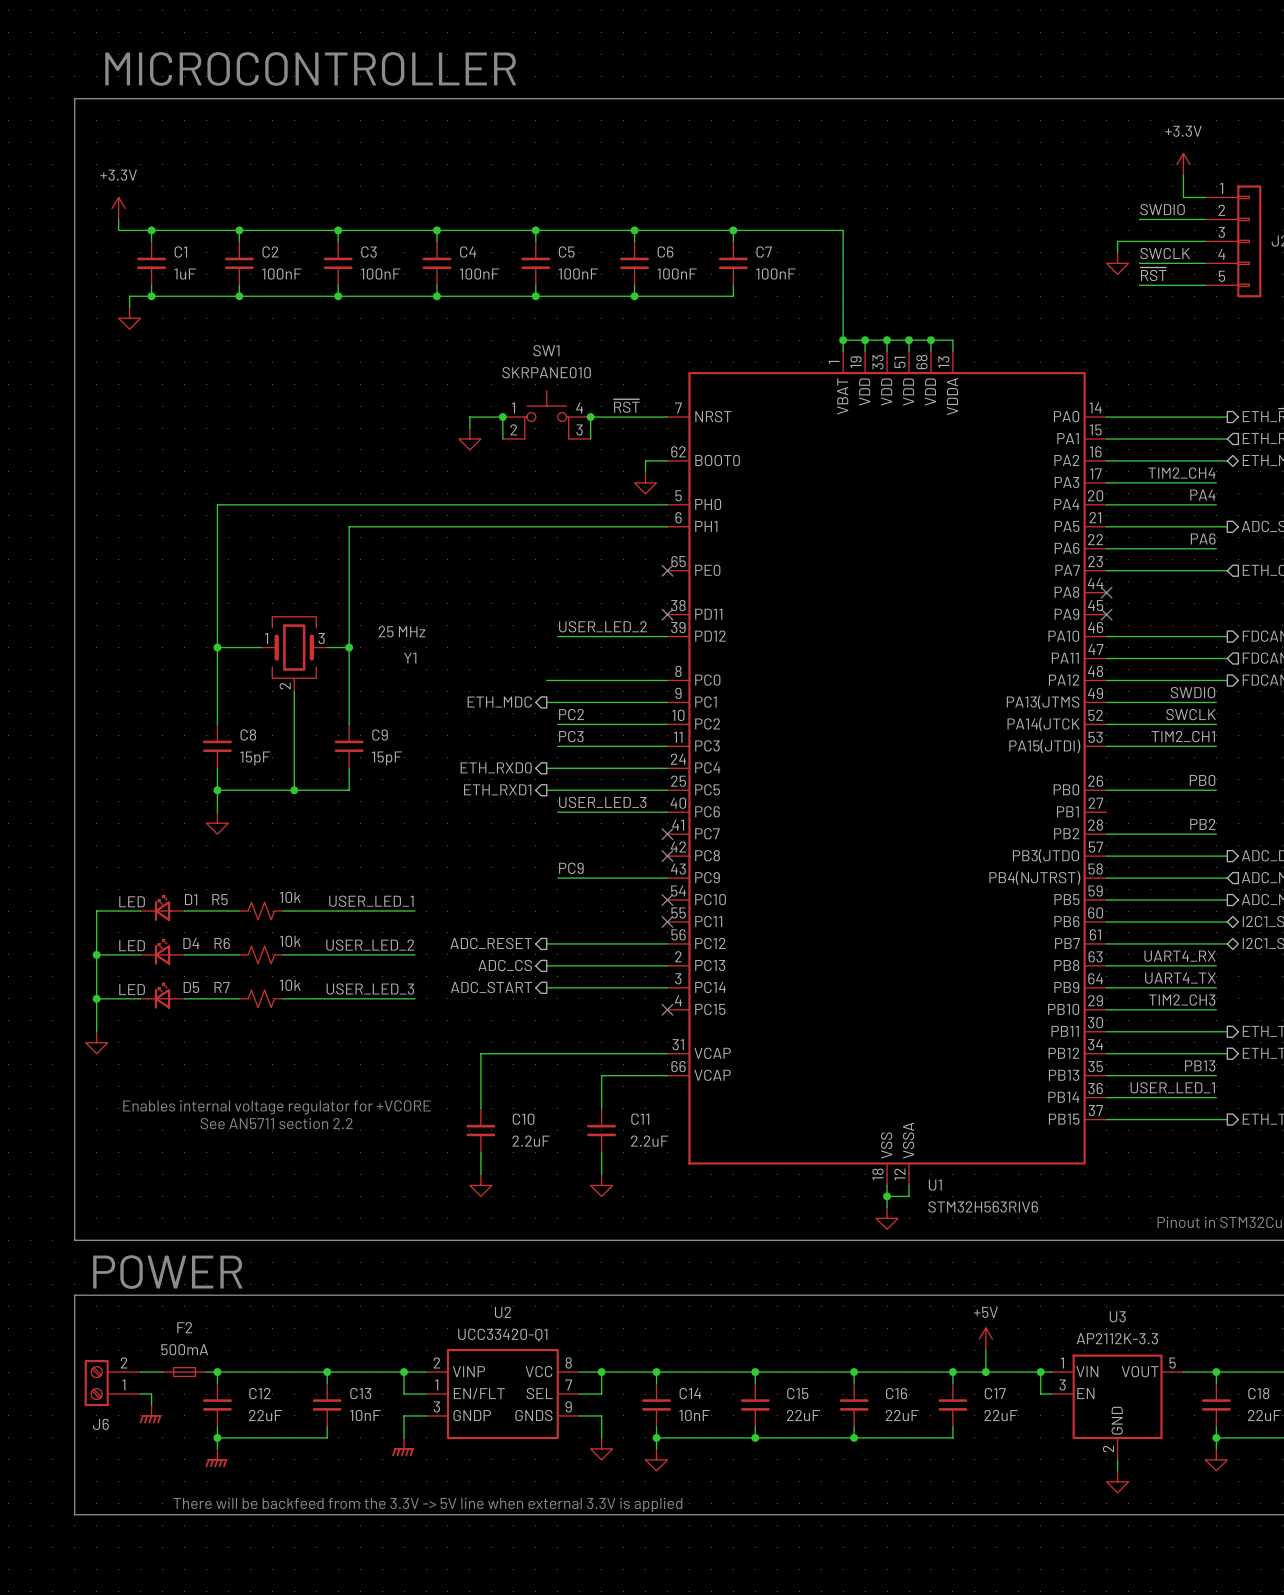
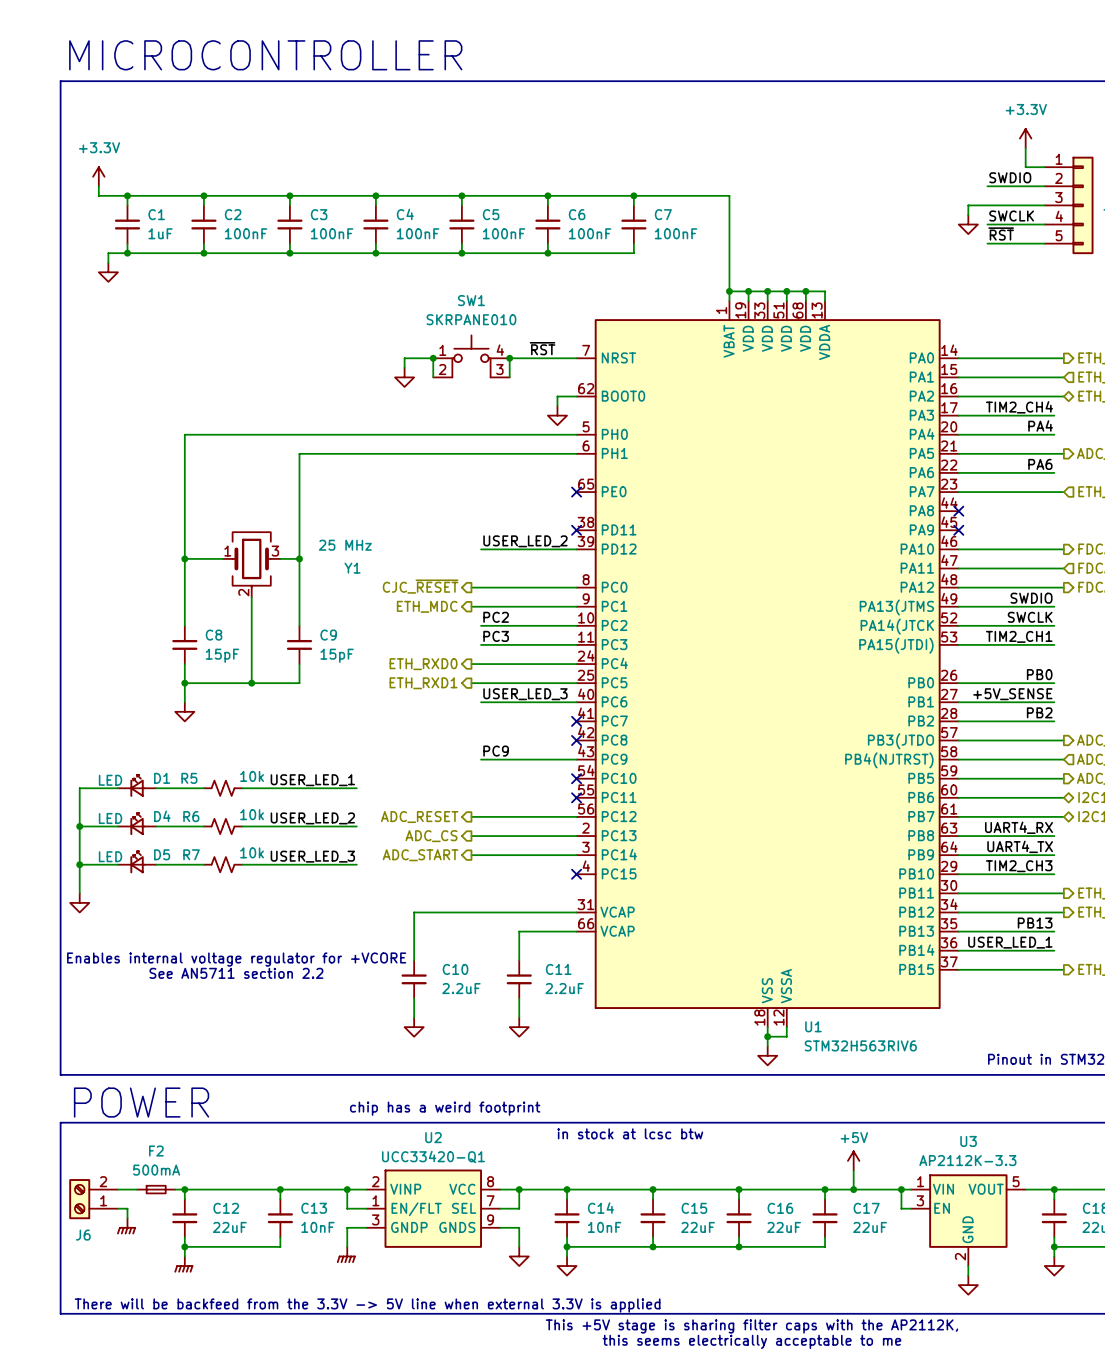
hierarchical label: none -> CJC_~{RESET} (420, 586)
label: none -> +5V_SENSE (1012, 694)
wire: none -> (958, 702) (1054, 702)
text: none -> chip has a weird footprint (445, 1108)
text: none -> in stock at lcsc btw (630, 1133)
text: none -> This +5V stage is sharing filter caps with the AP2112K, (751, 1326)
text: none -> this seems electrically acceptable to me (751, 1341)

